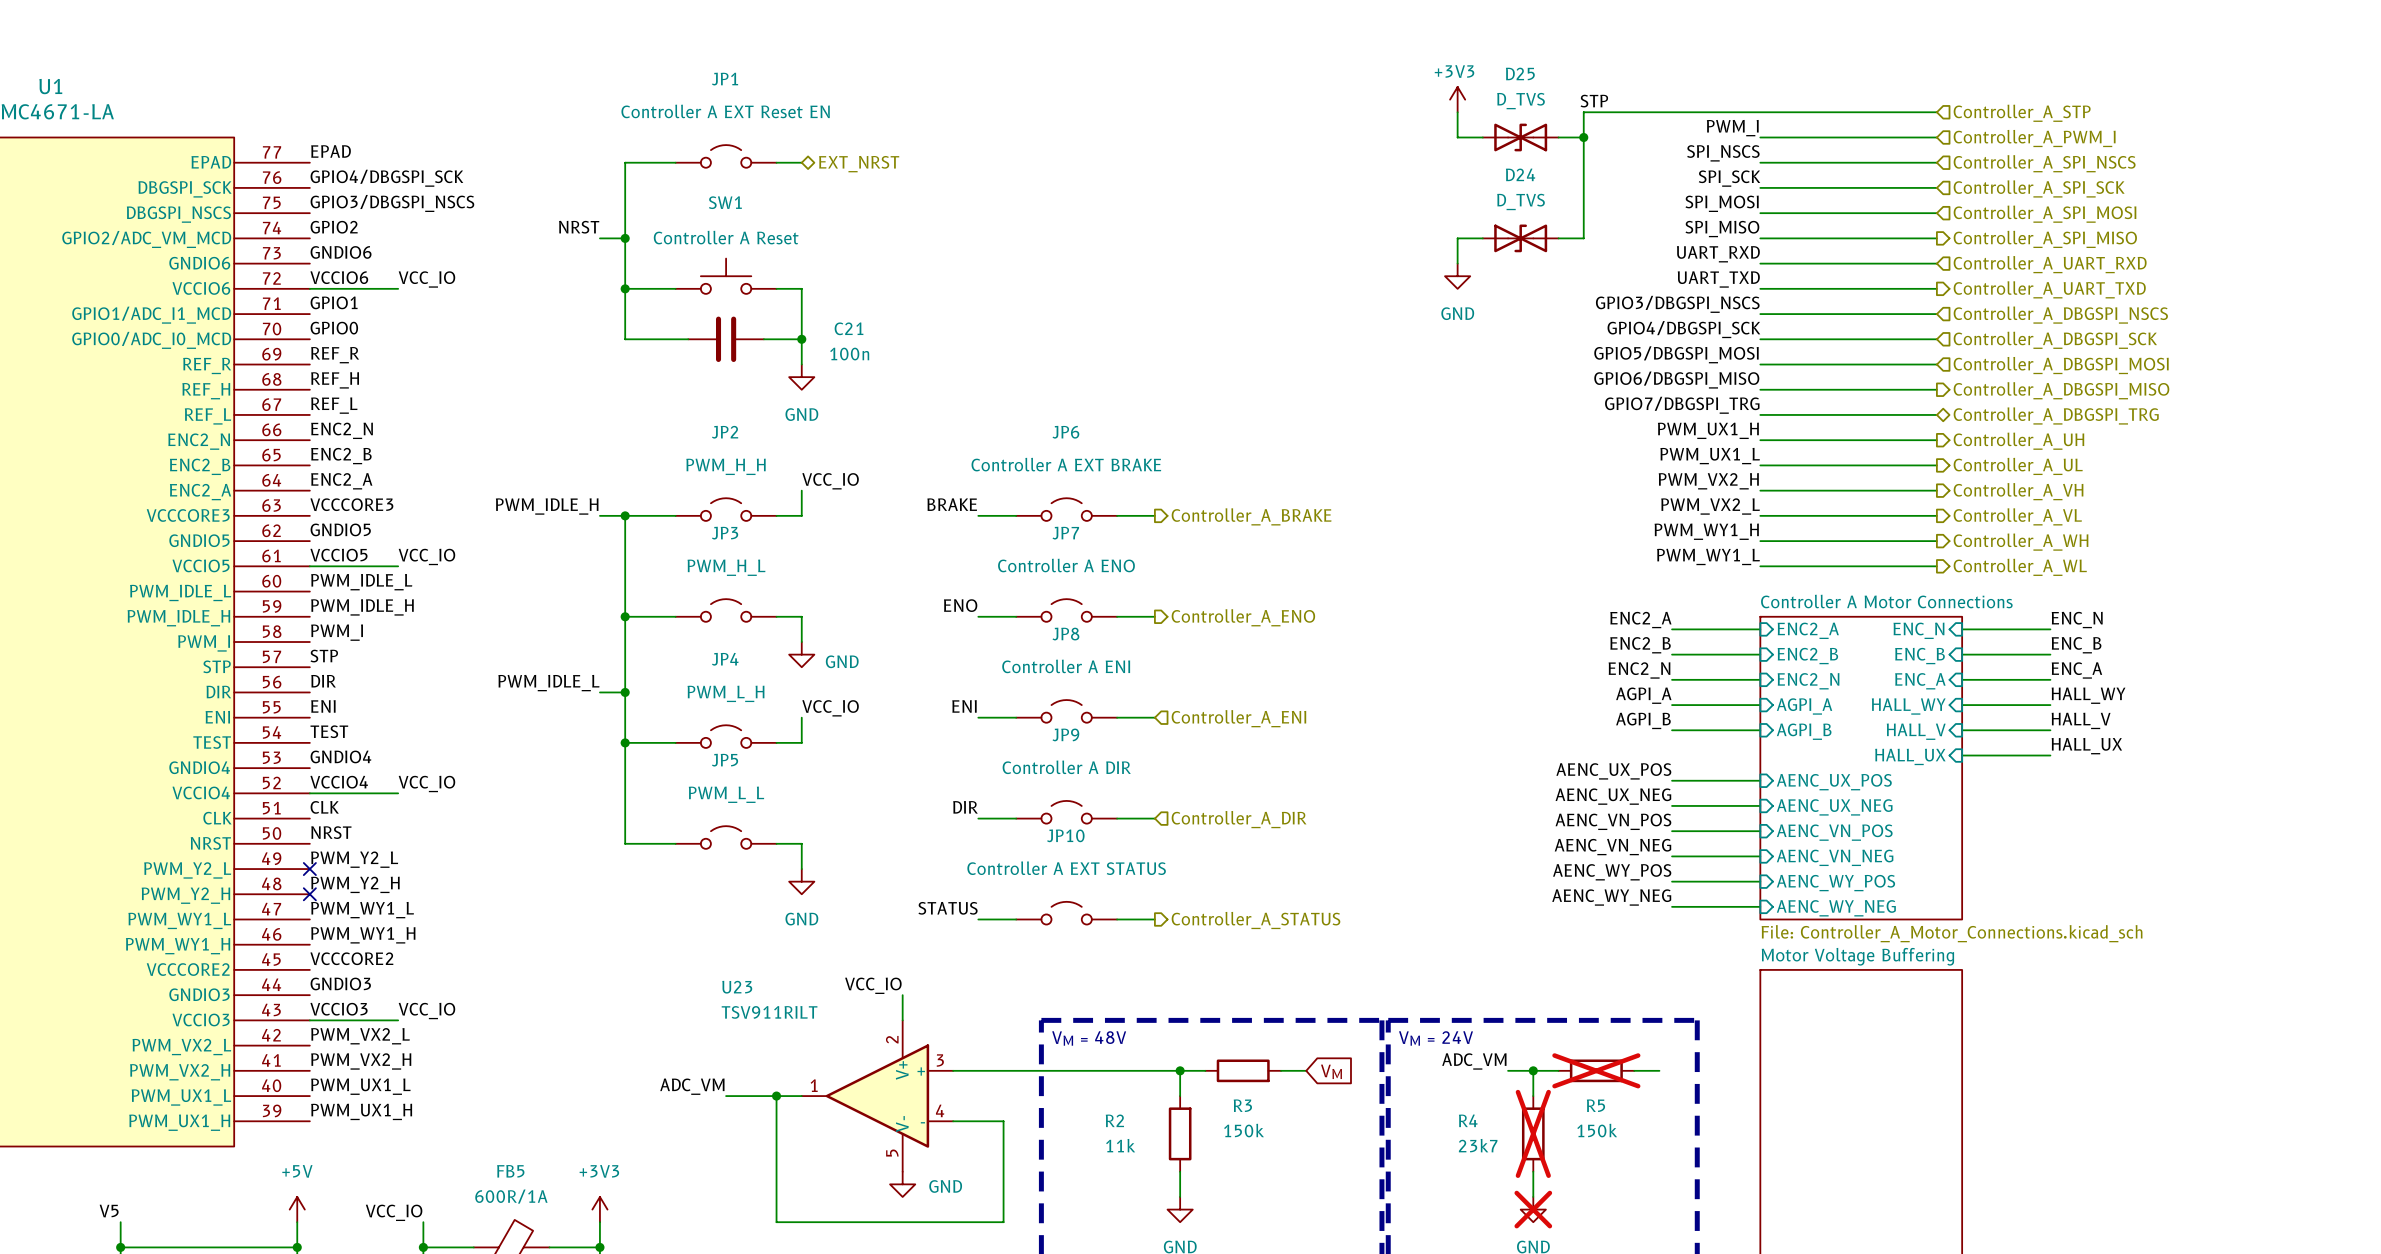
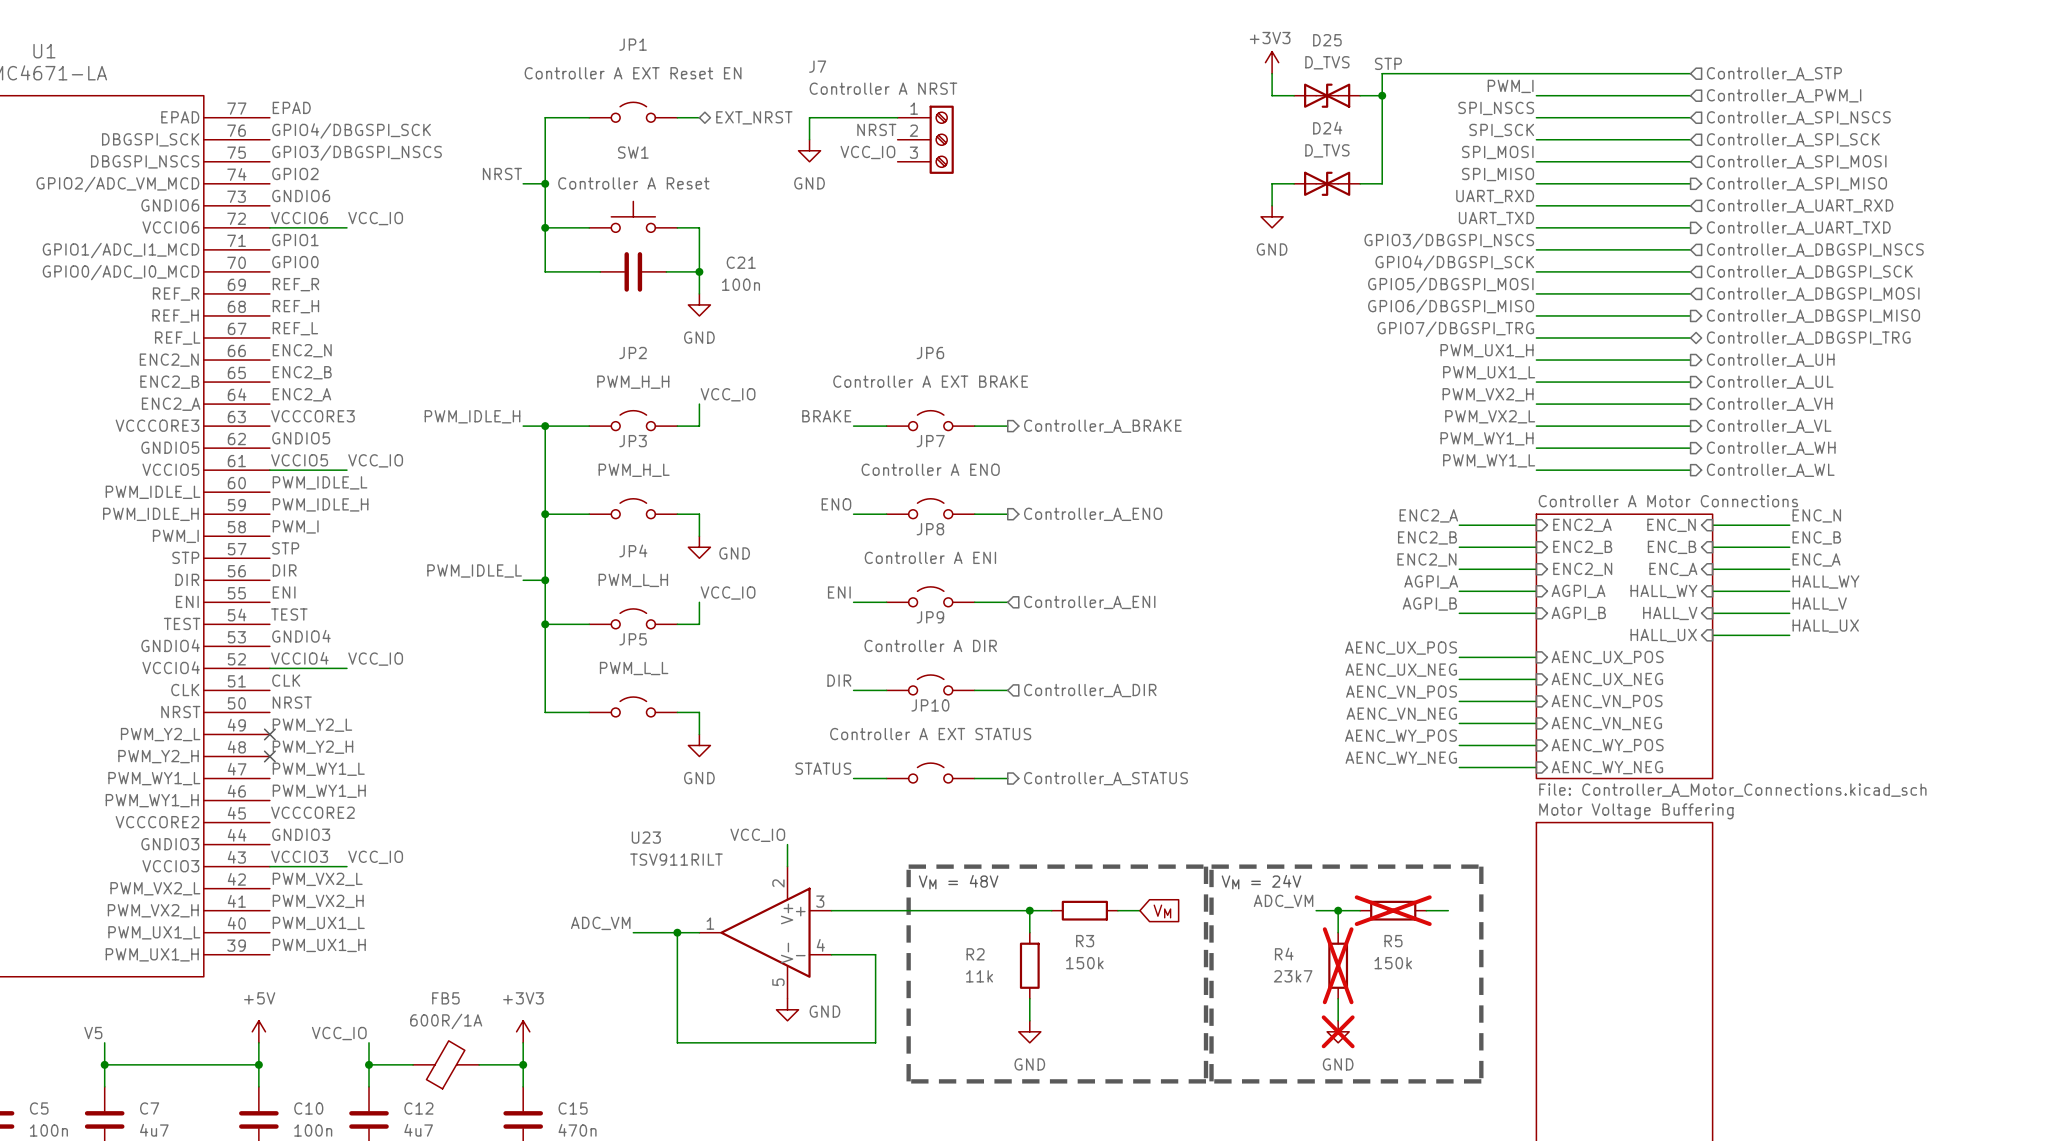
wire: none -> (897, 117) (809, 117) (809, 139)
label: none -> NRST (876, 129)
J7: none -> Controller A NRST (925, 139)
power symbol: none -> GND (809, 150)
label: none -> VCC_IO (867, 152)

